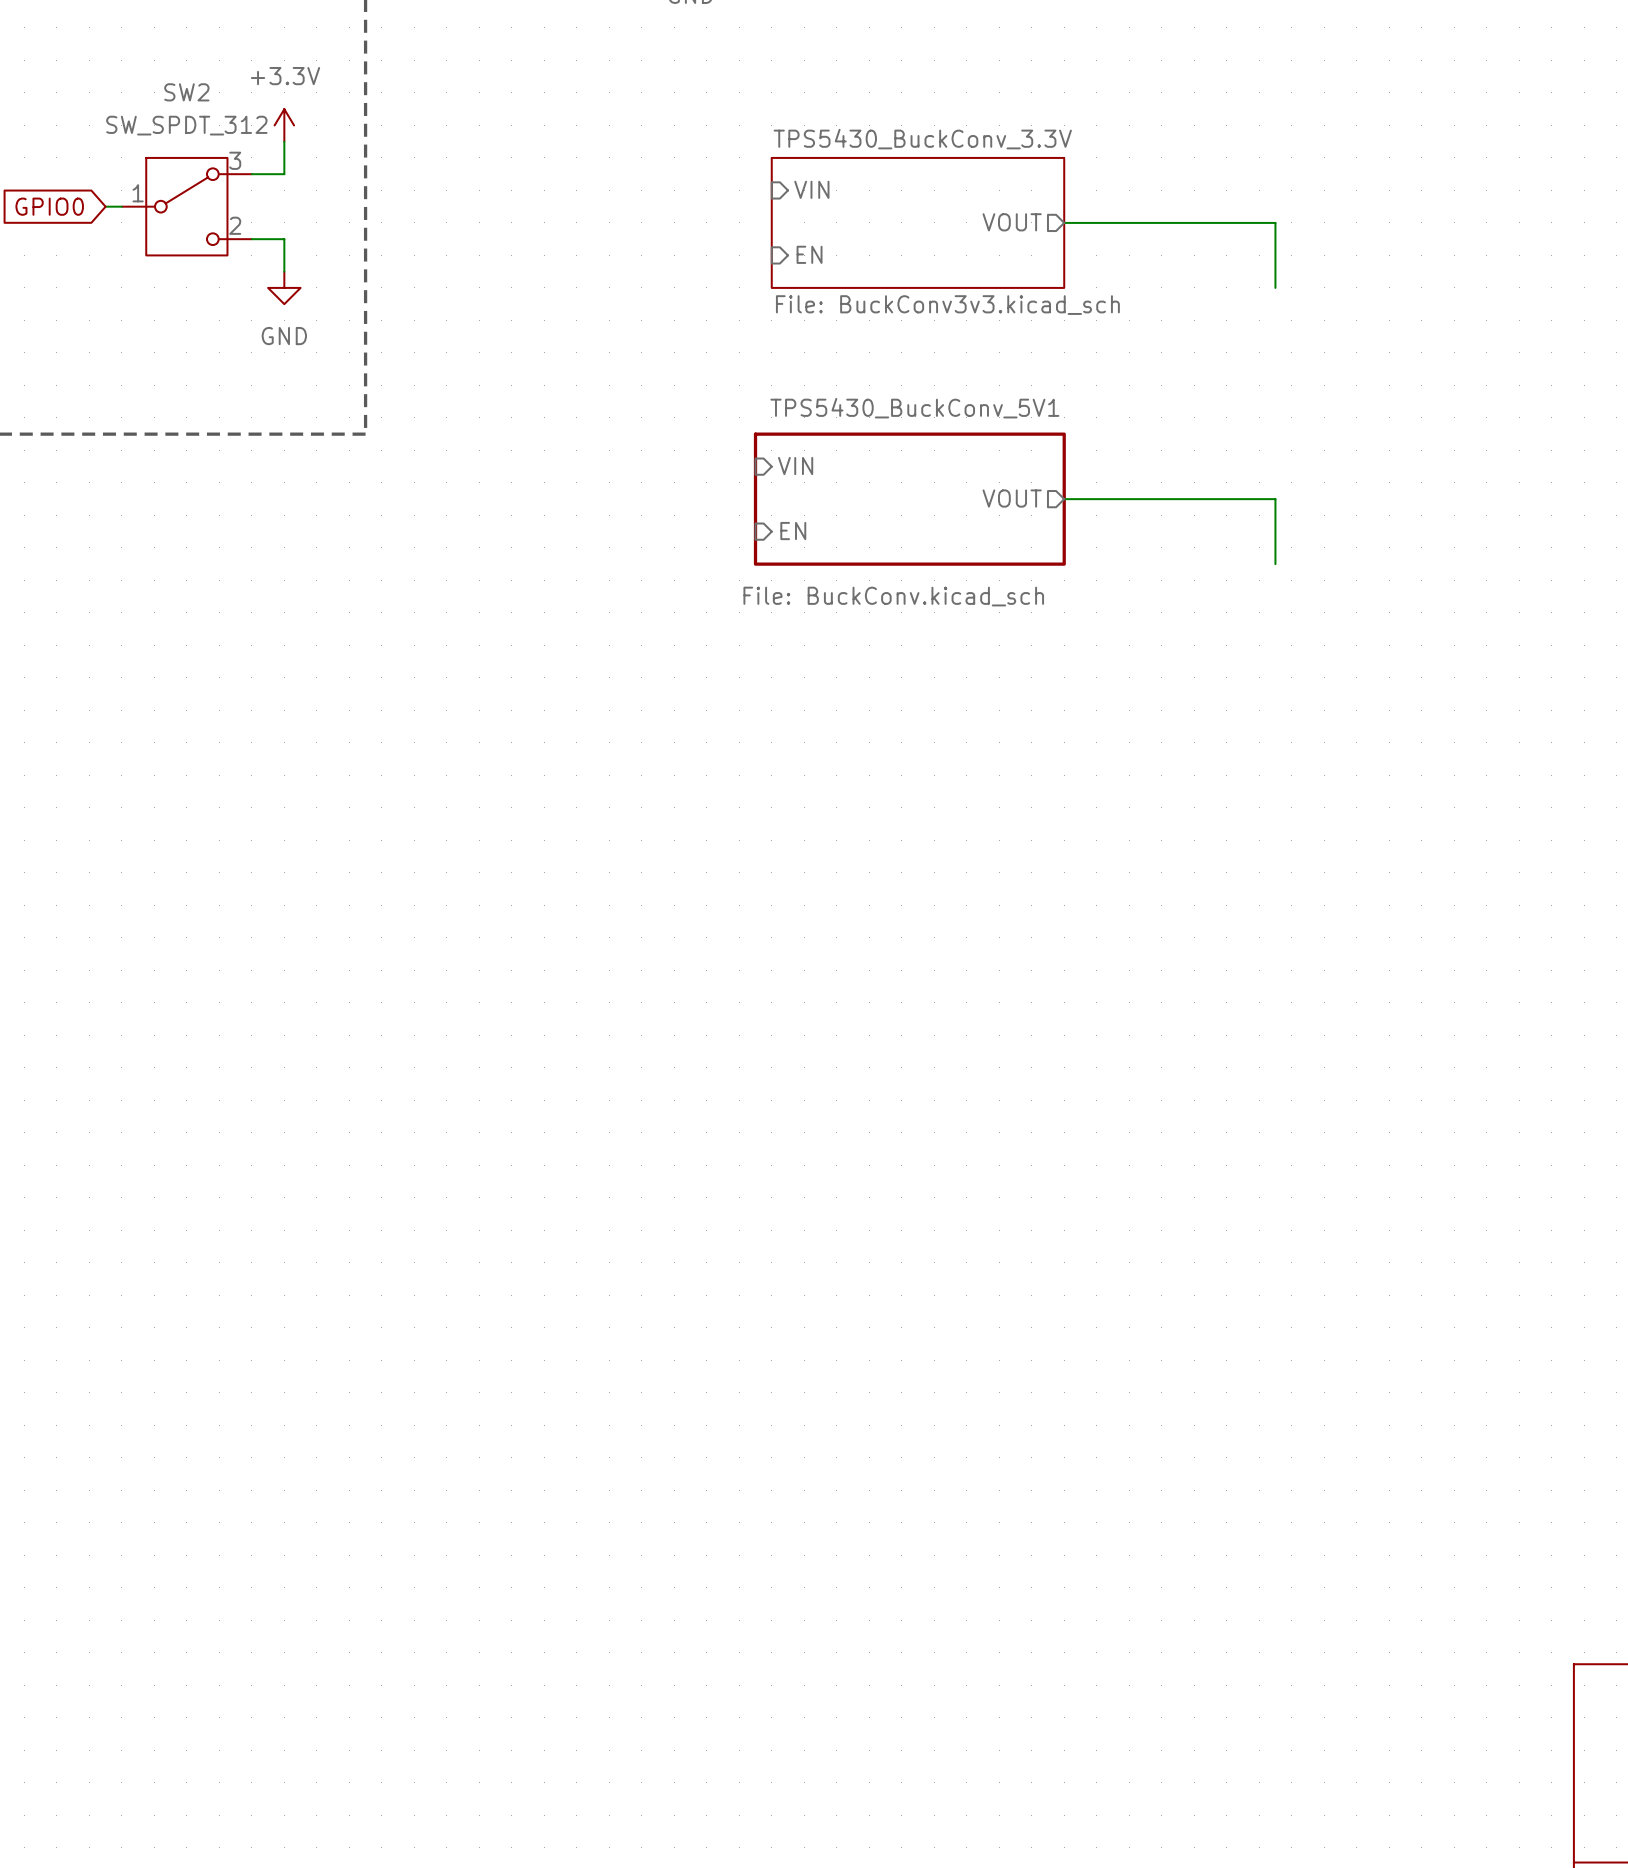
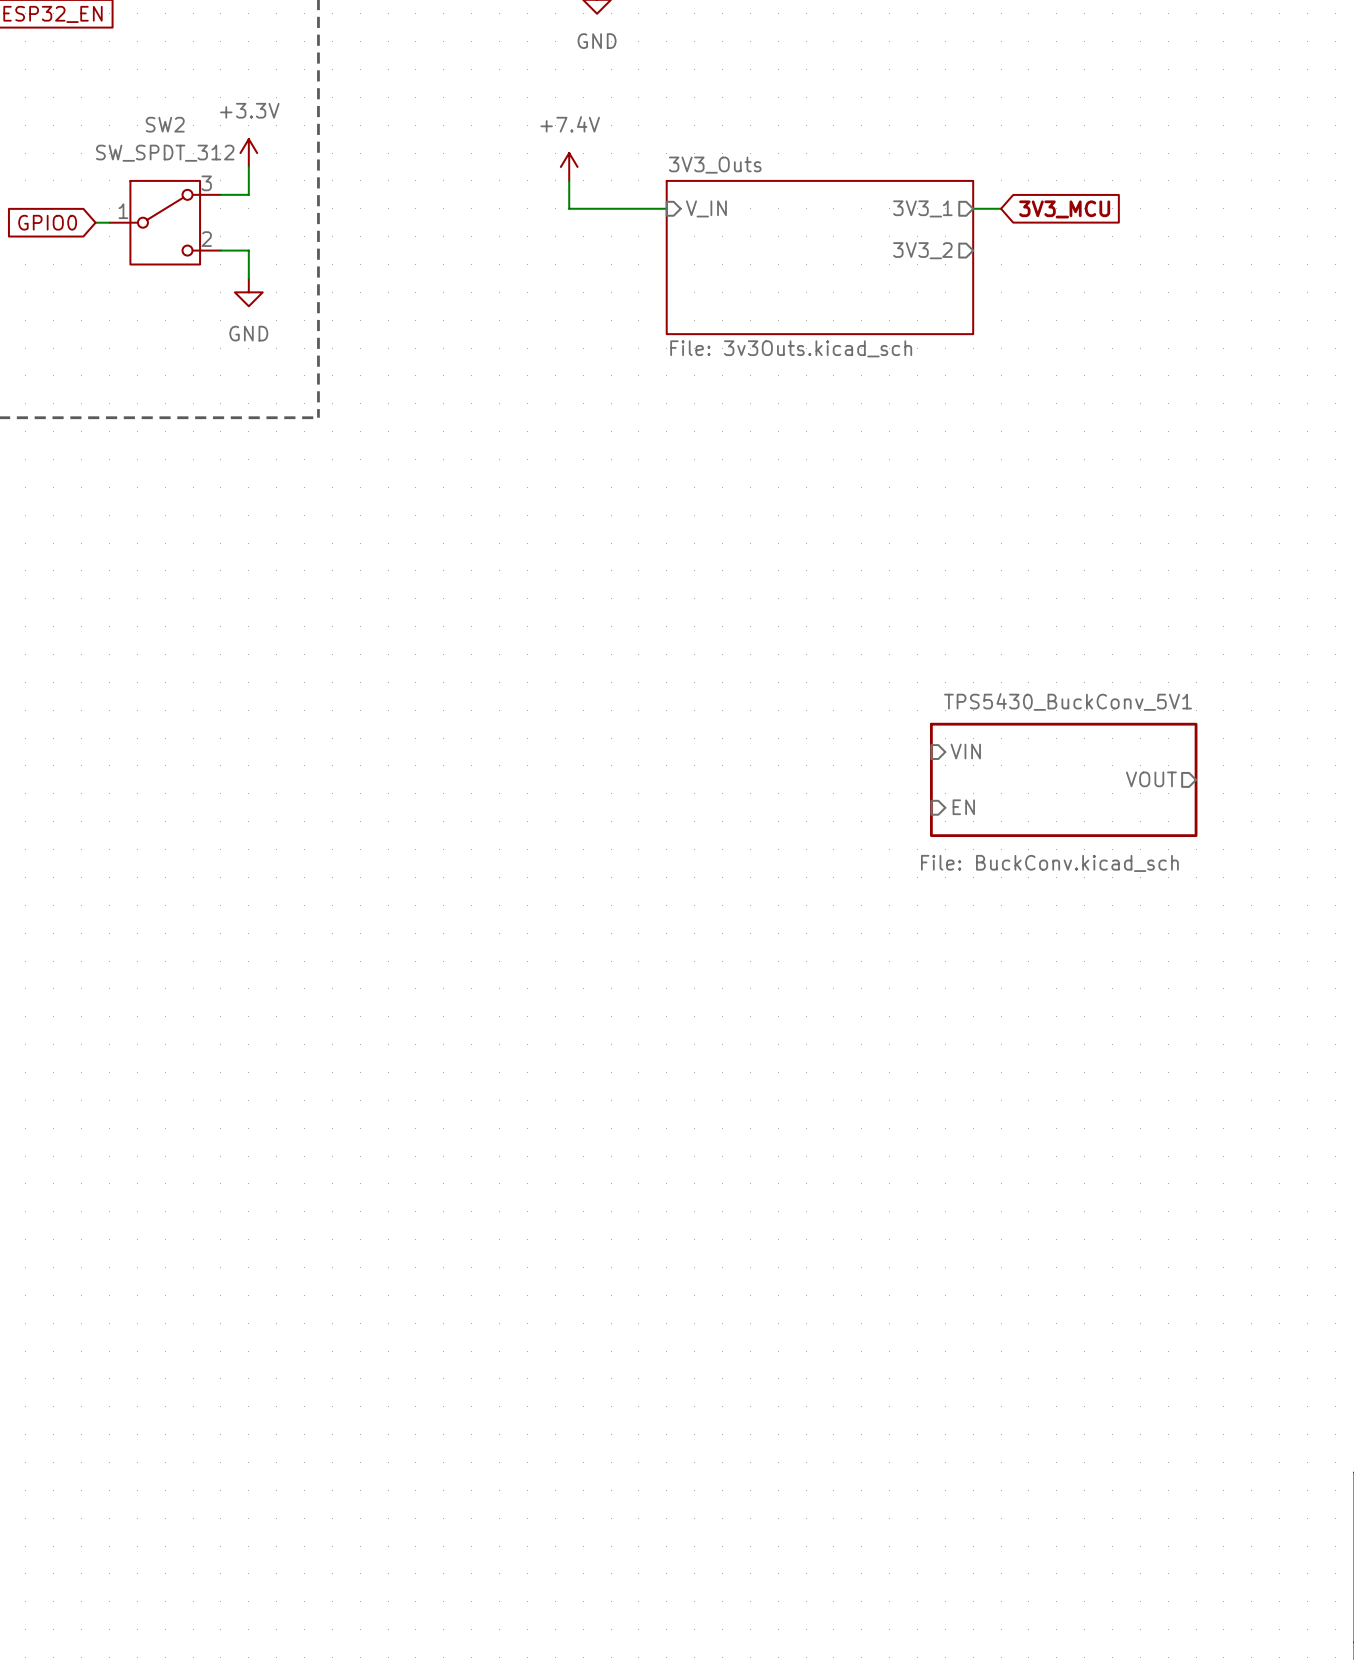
power symbol: none -> +7.4V (569, 166)
wire: none -> (569, 180) (569, 208) (666, 208)
sheet pin: VIN (811, 189) -> V_IN (706, 208)
sheet pin: none -> 3V3_1 (922, 208)
wire: none -> (973, 208) (1001, 208)
global label: none -> 3V3_MCU (1064, 209)
sheet TPS5430_BuckConv_3.3V: File: BuckConv3v3.kicad_sch (917, 222) -> none
sheet pin: VOUT (1012, 222) -> none
wire: (1064, 222) (1275, 222) (1275, 287) -> none
sheet pin: none -> 3V3_2 (922, 250)
sheet 3V3_Outs: none -> File: 3v3Outs.kicad_sch (819, 257)
sheet pin: EN (809, 254) -> none
sheet pin: VIN (795, 466) -> none
sheet pin: VOUT (1012, 498) -> none
sheet TPS5430_BuckConv_5V1 position: (909, 499) -> (1063, 779)
wire: (1064, 499) (1275, 499) (1275, 564) -> none
sheet pin: EN (793, 531) -> none
sheet pin: none -> VIN (965, 751)
sheet pin: none -> VOUT (1151, 779)
sheet pin: none -> EN (963, 807)

